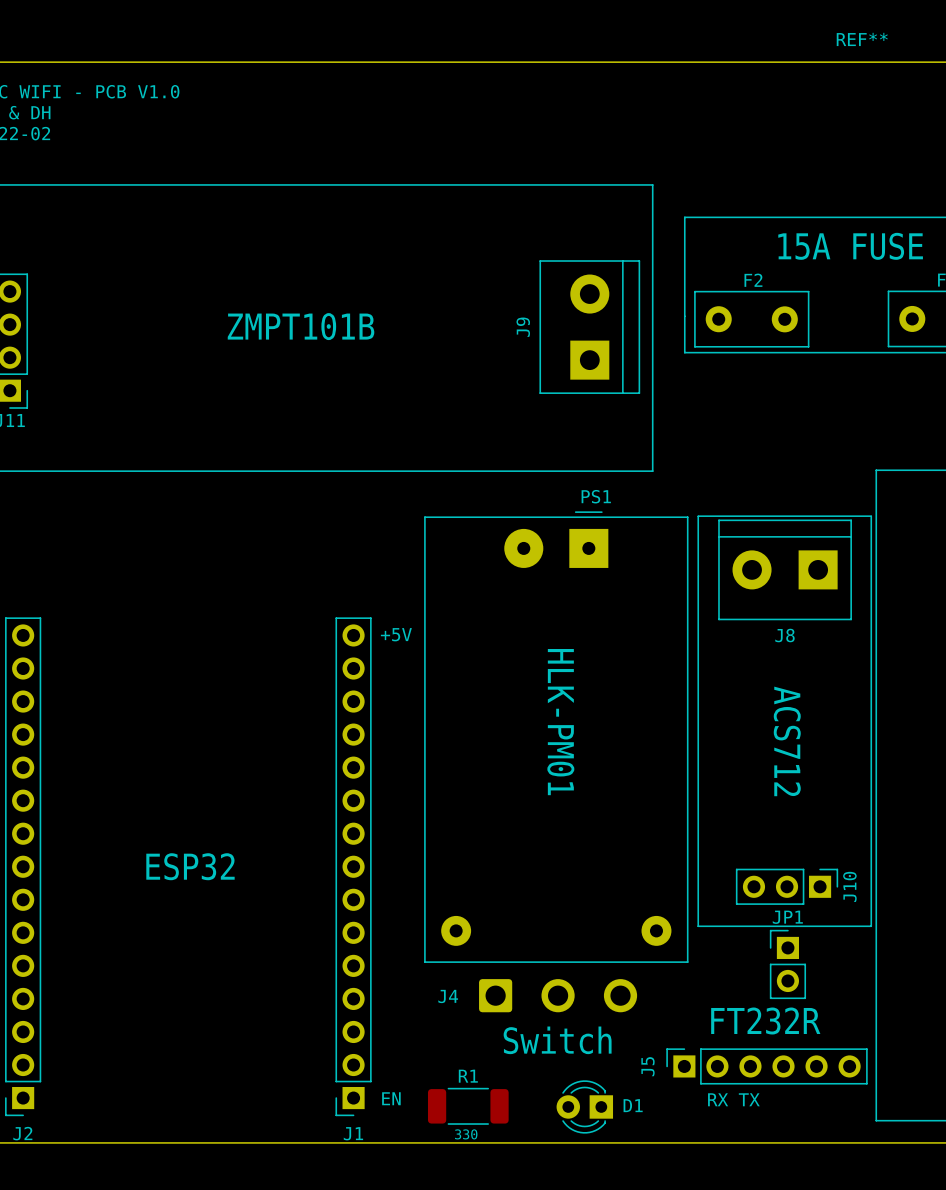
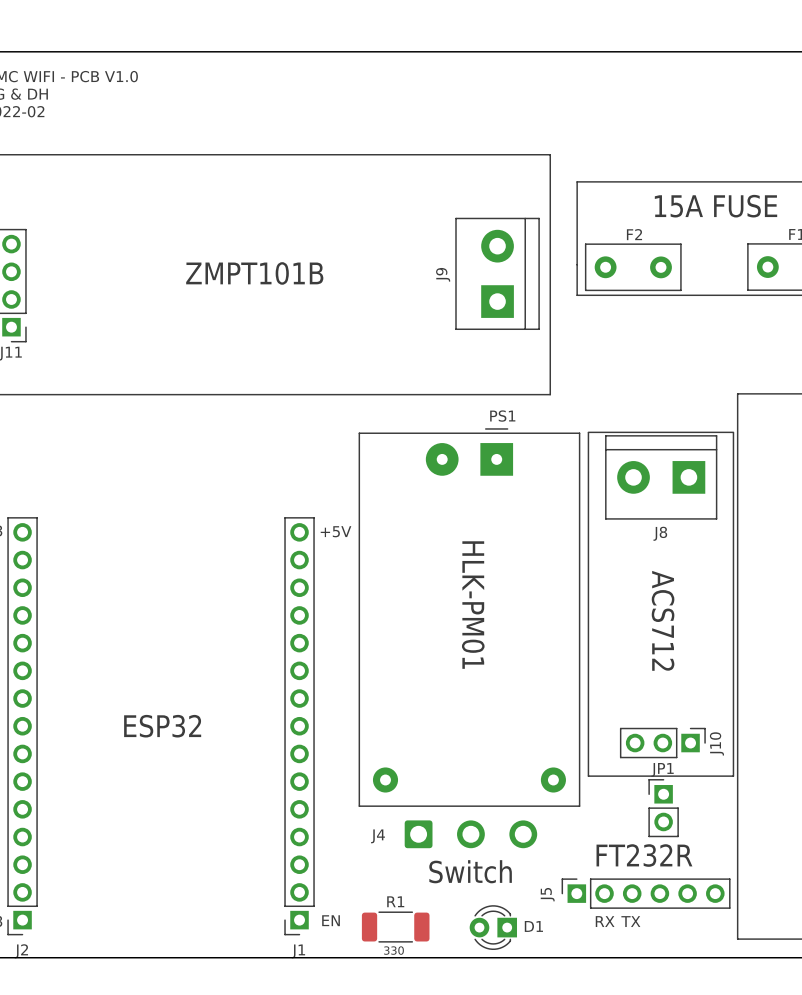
REF**: (862, 39) -> none

